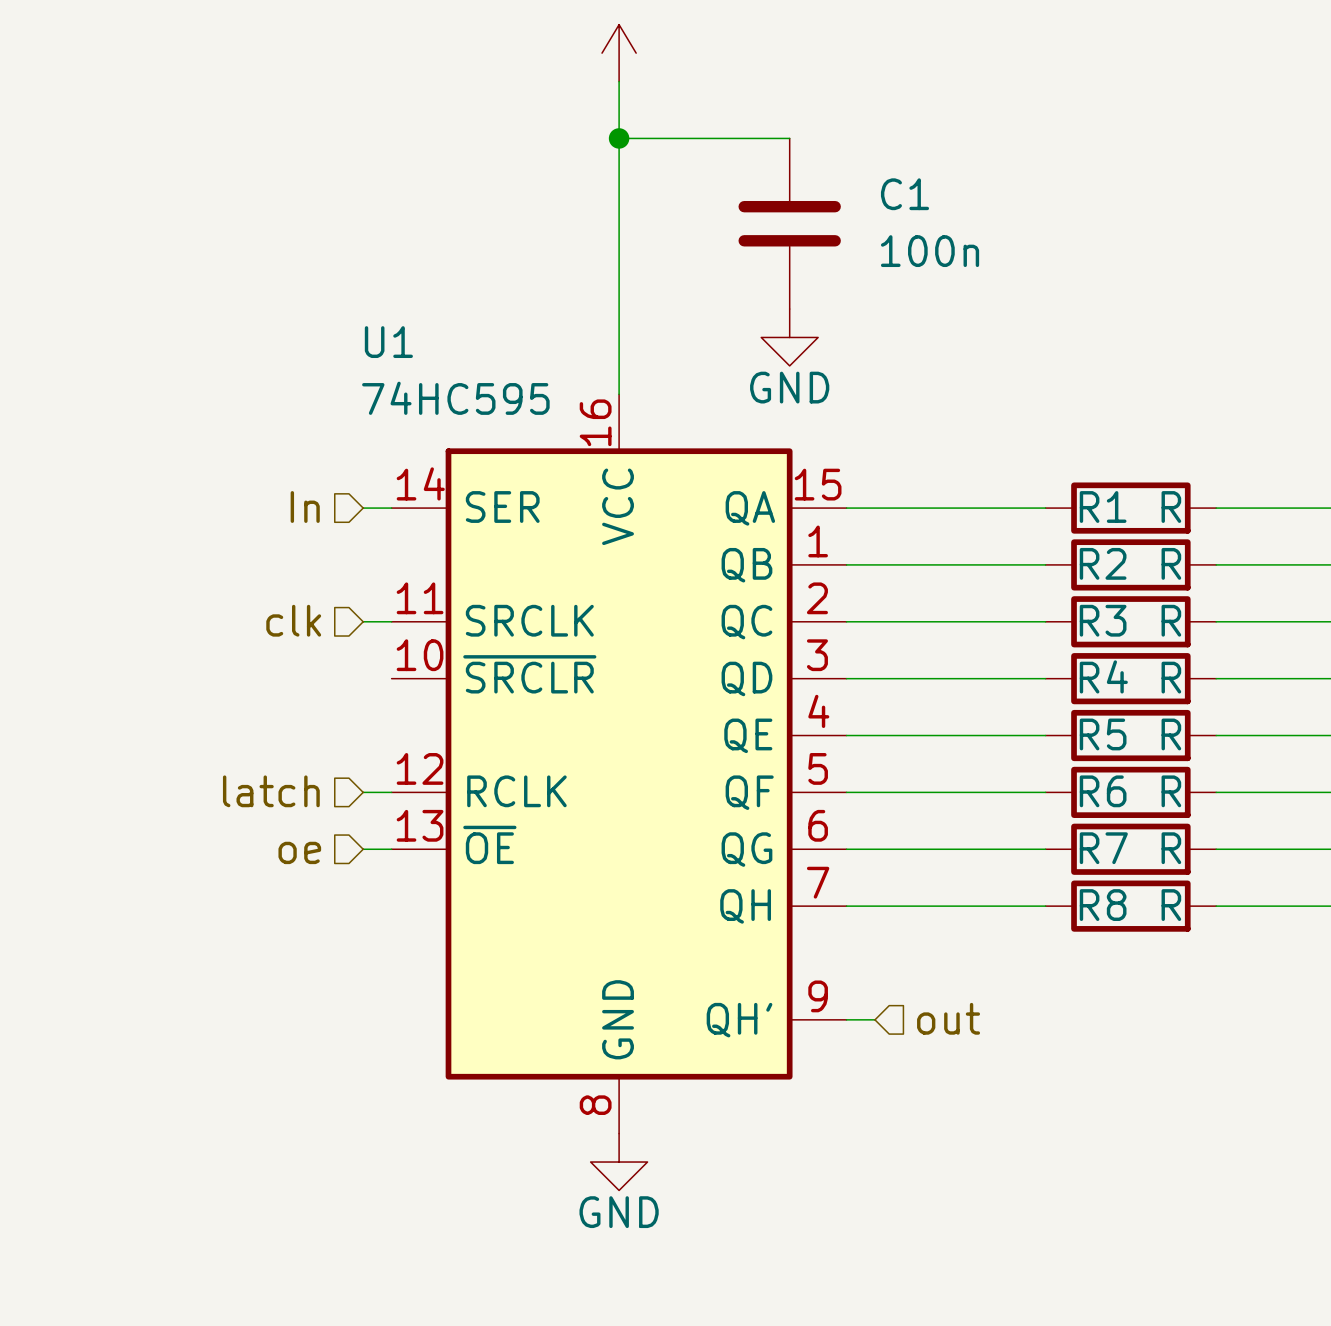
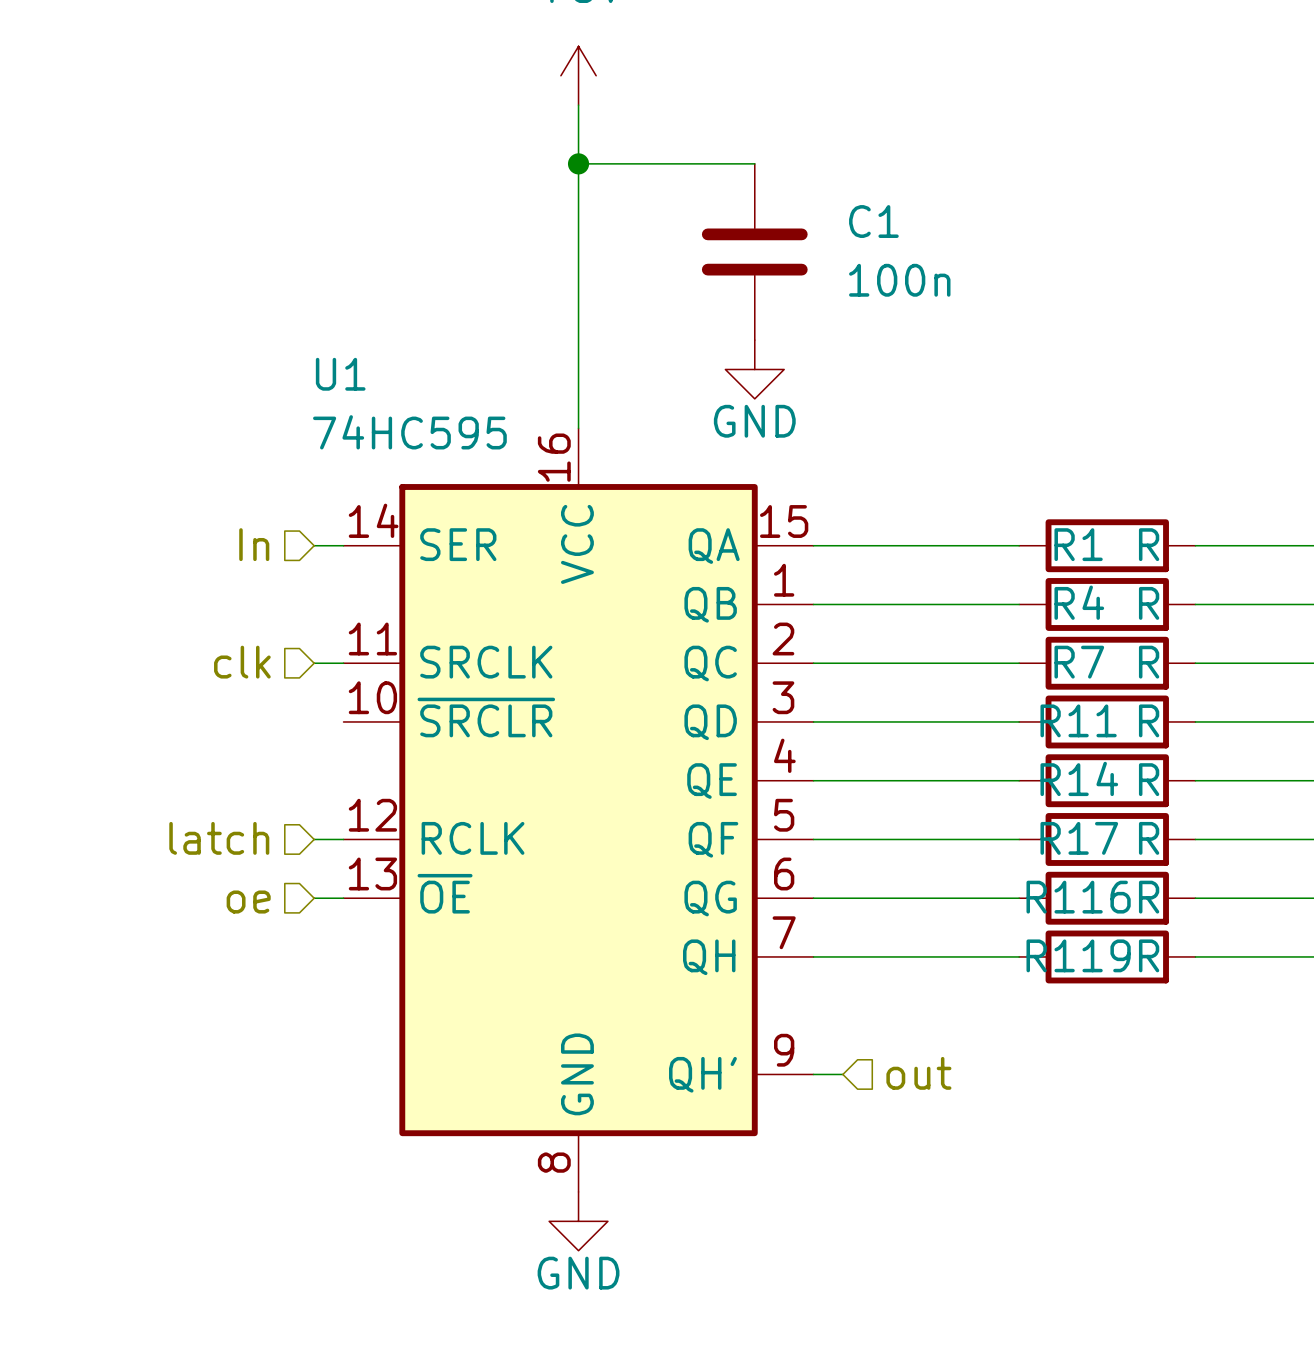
R2 name: R2 (1103, 563) -> R4 (1079, 602)
R3 name: R3 (1103, 620) -> R7 (1079, 662)
R4 name: R4 (1103, 676) -> R11 (1078, 720)
R5 name: R5 (1103, 734) -> R14 (1079, 778)
R6 name: R6 (1103, 791) -> R17 (1079, 838)
R7 name: R7 (1103, 848) -> R116 (1078, 897)
R8 name: R8 (1103, 905) -> R119 (1078, 955)

